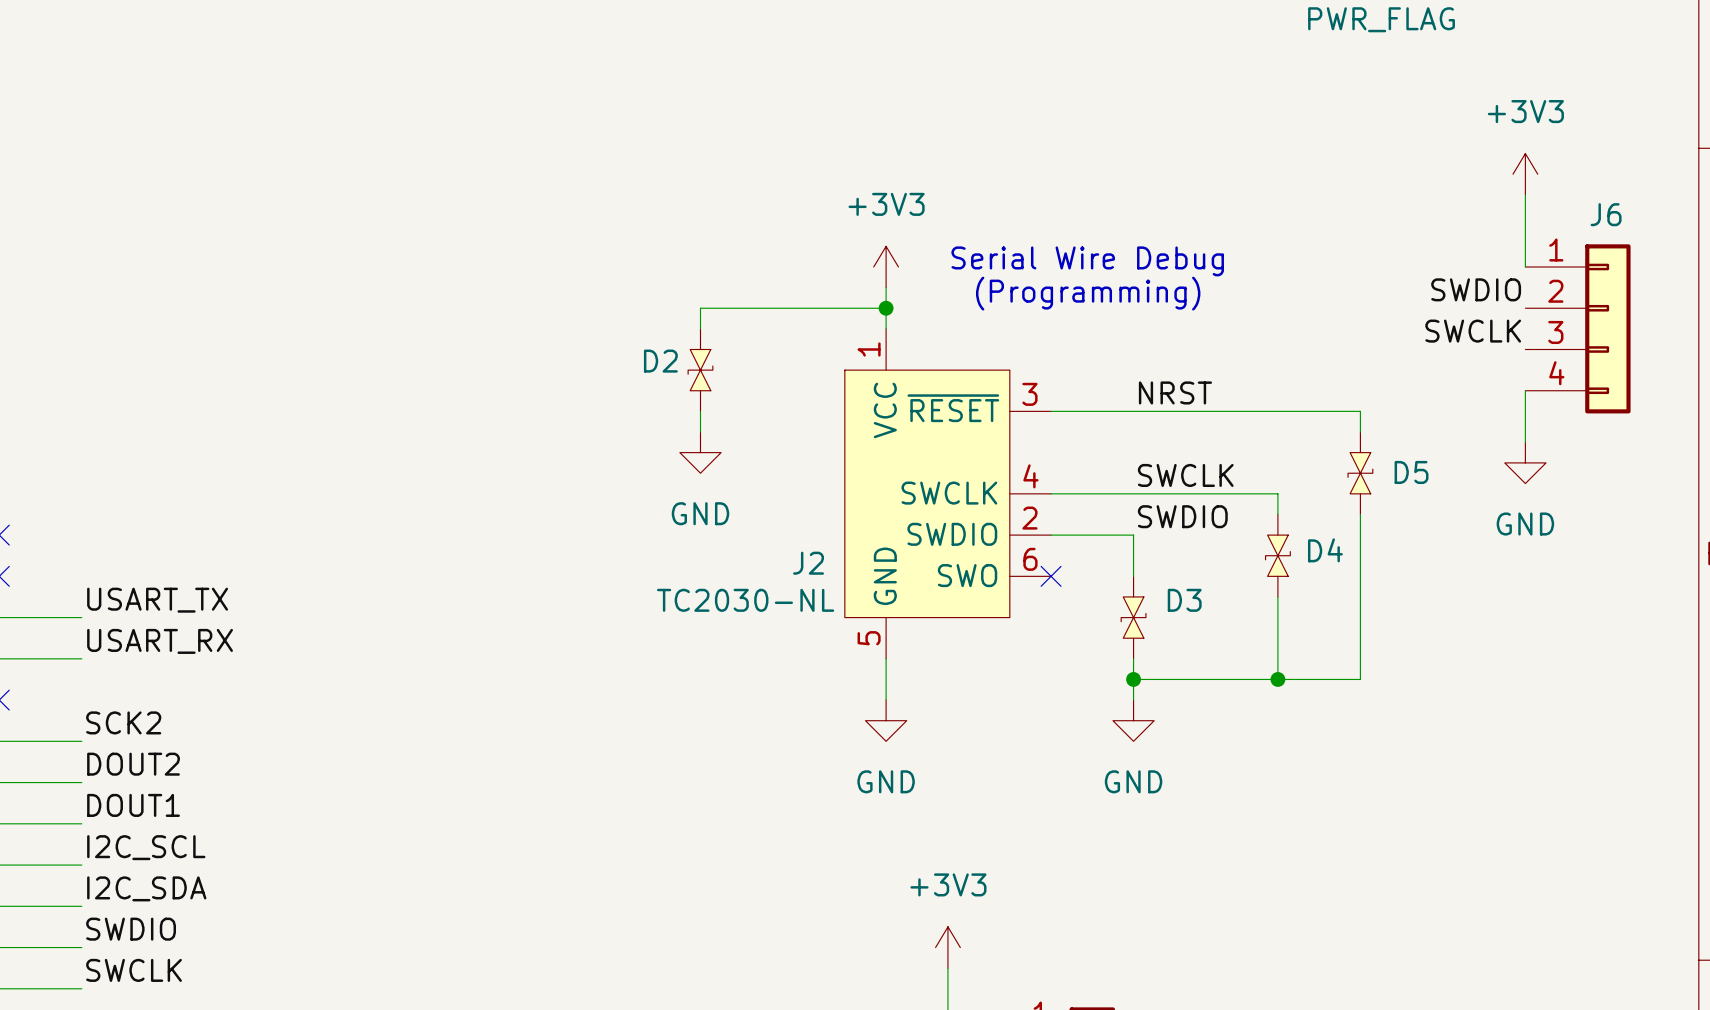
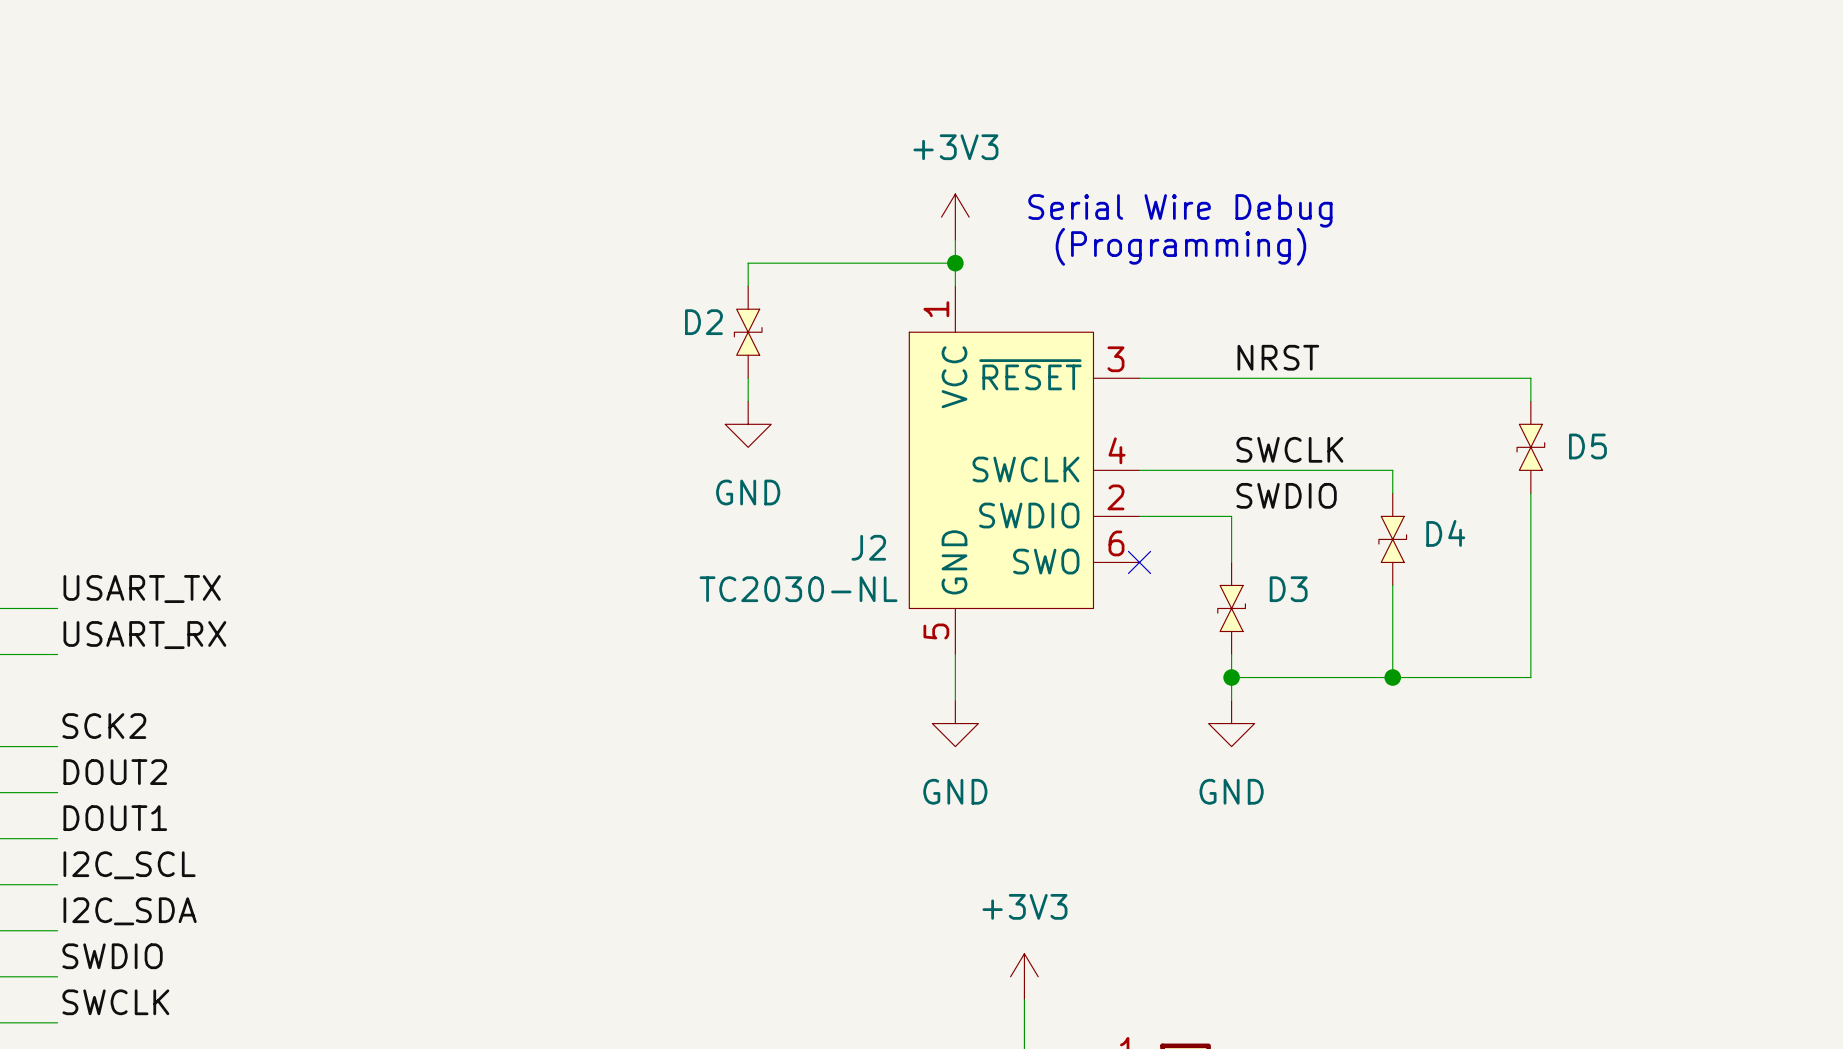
power symbol: +3V3 (1525, 174) -> none
wire: (1525, 194) (1525, 267) -> none
label: SWDIO (1476, 289) -> none
J6: (1577, 328) -> none
label: SWCLK (1473, 331) -> none
wire: (1525, 390) (1525, 442) -> none
wire: (1360, 411) (1360, 431) -> (1484, 378) (1530, 378) (1530, 401)
power symbol: GND (1525, 462) -> none
D5 position: (1360, 473) -> (1530, 447)
wire: (1360, 514) (1360, 679) -> (1530, 493) (1530, 677) (1484, 677)

